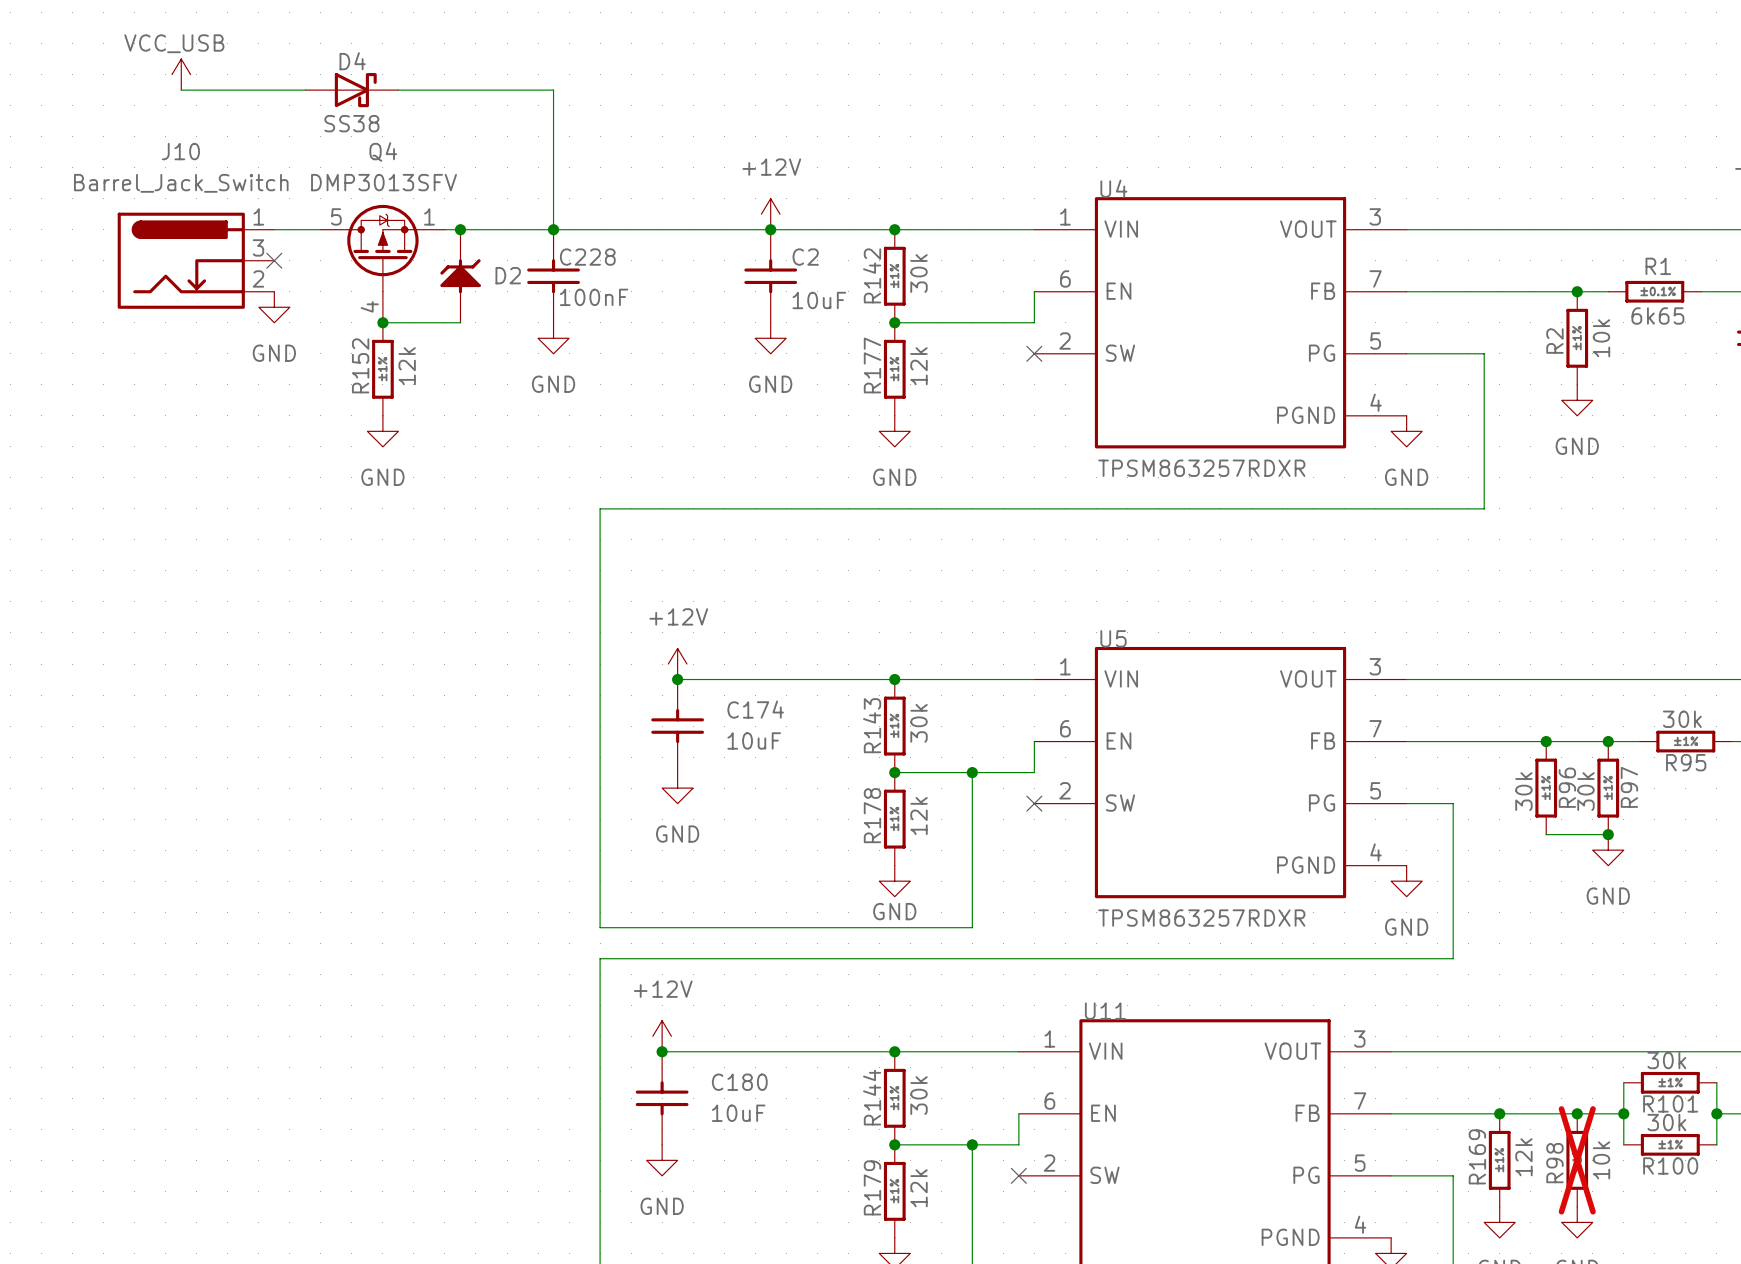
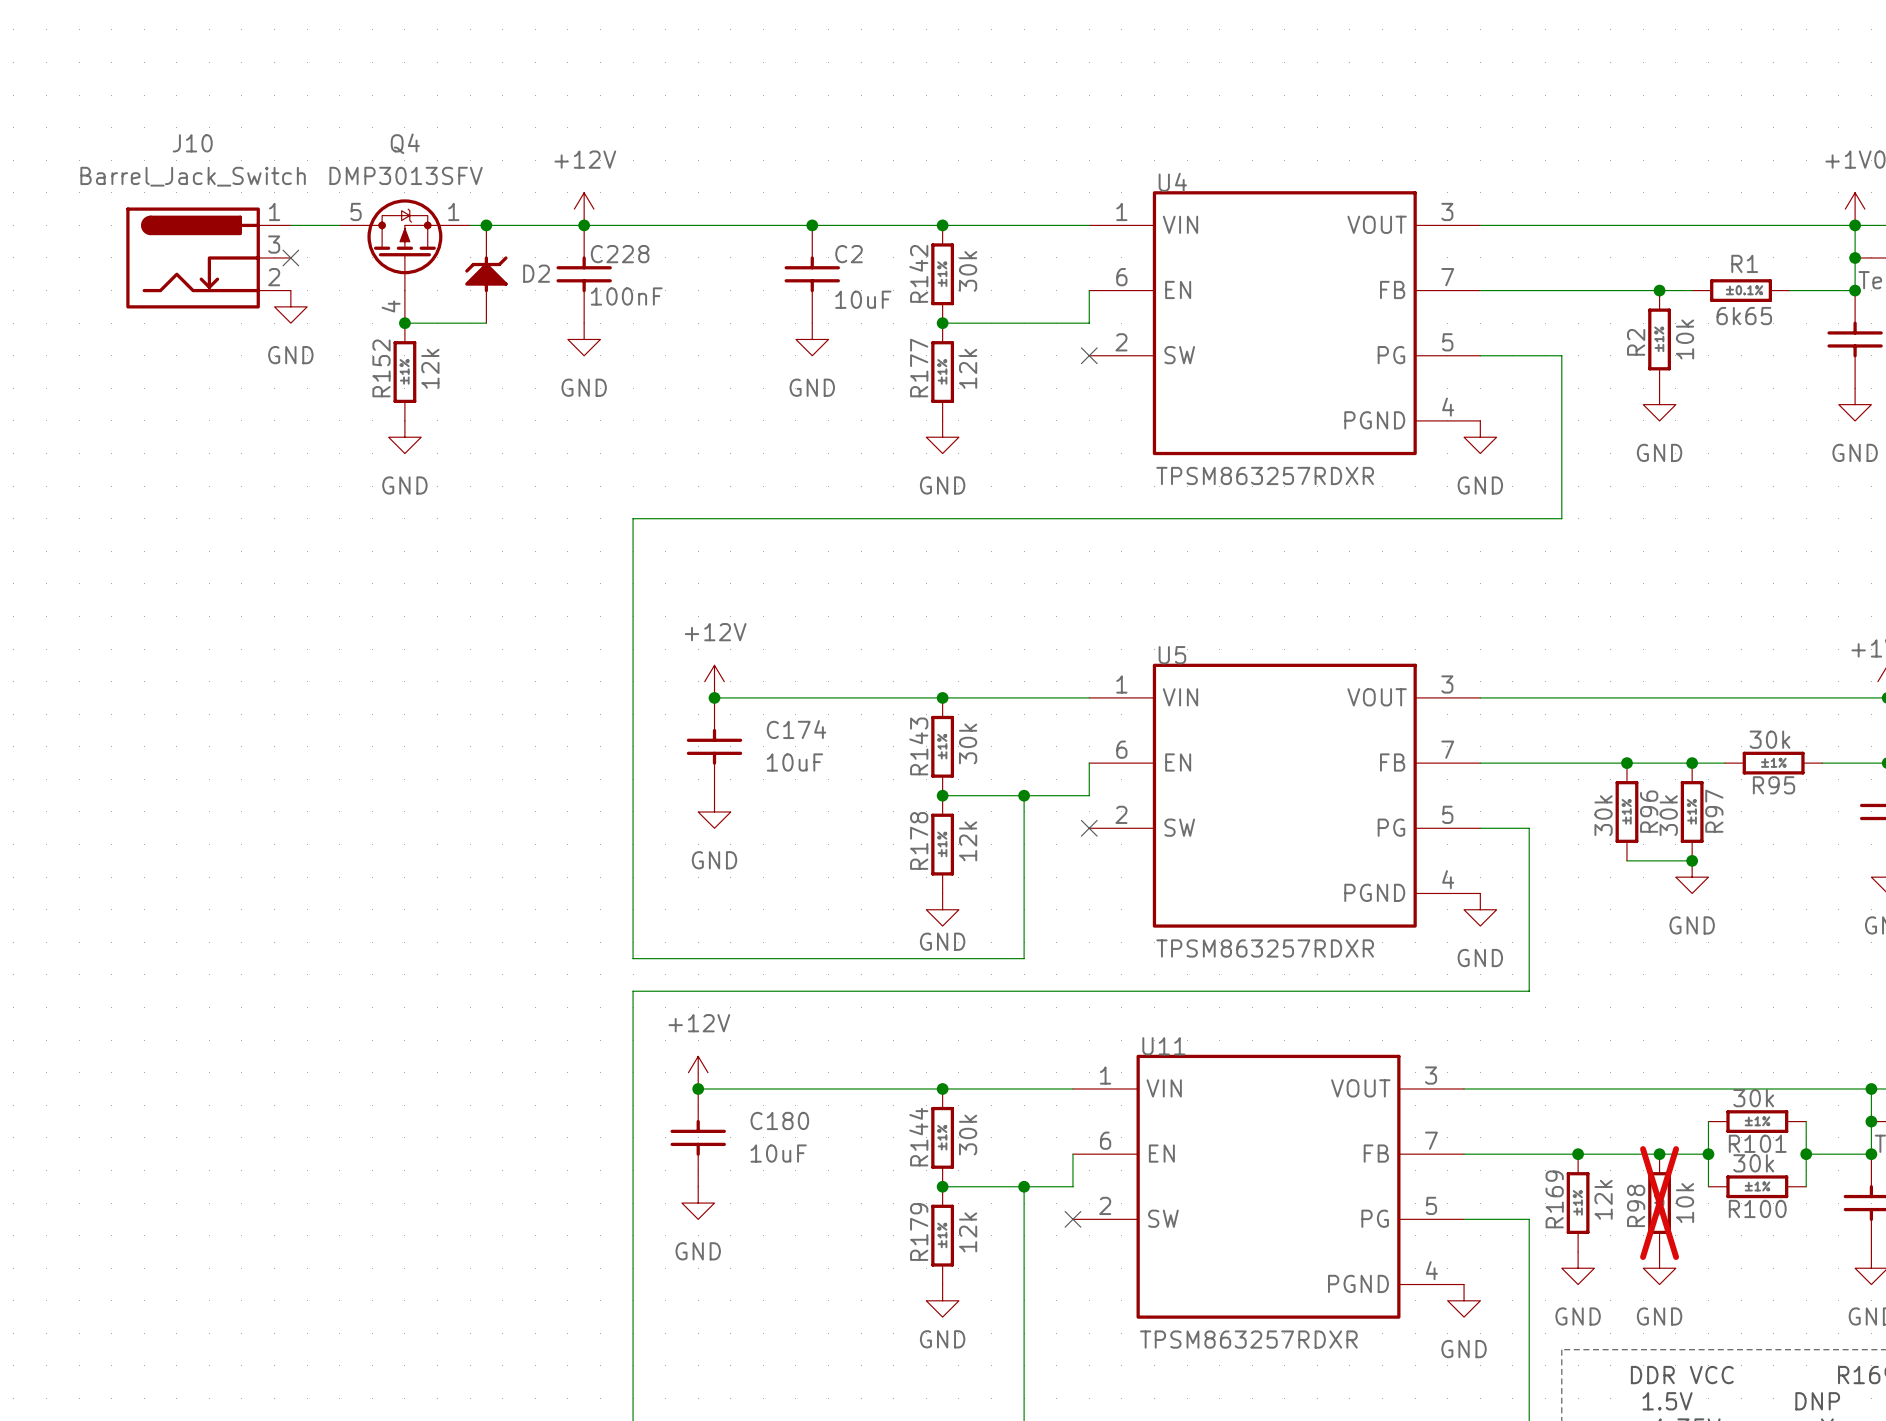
power symbol: VCC_USB (181, 74) -> none
wire: (181, 90) (305, 90) -> none
D4: SS38 (351, 90) -> none
wire: (398, 90) (553, 90) (553, 229) -> none
power symbol position: +12V (770, 214) -> +12V (584, 209)

